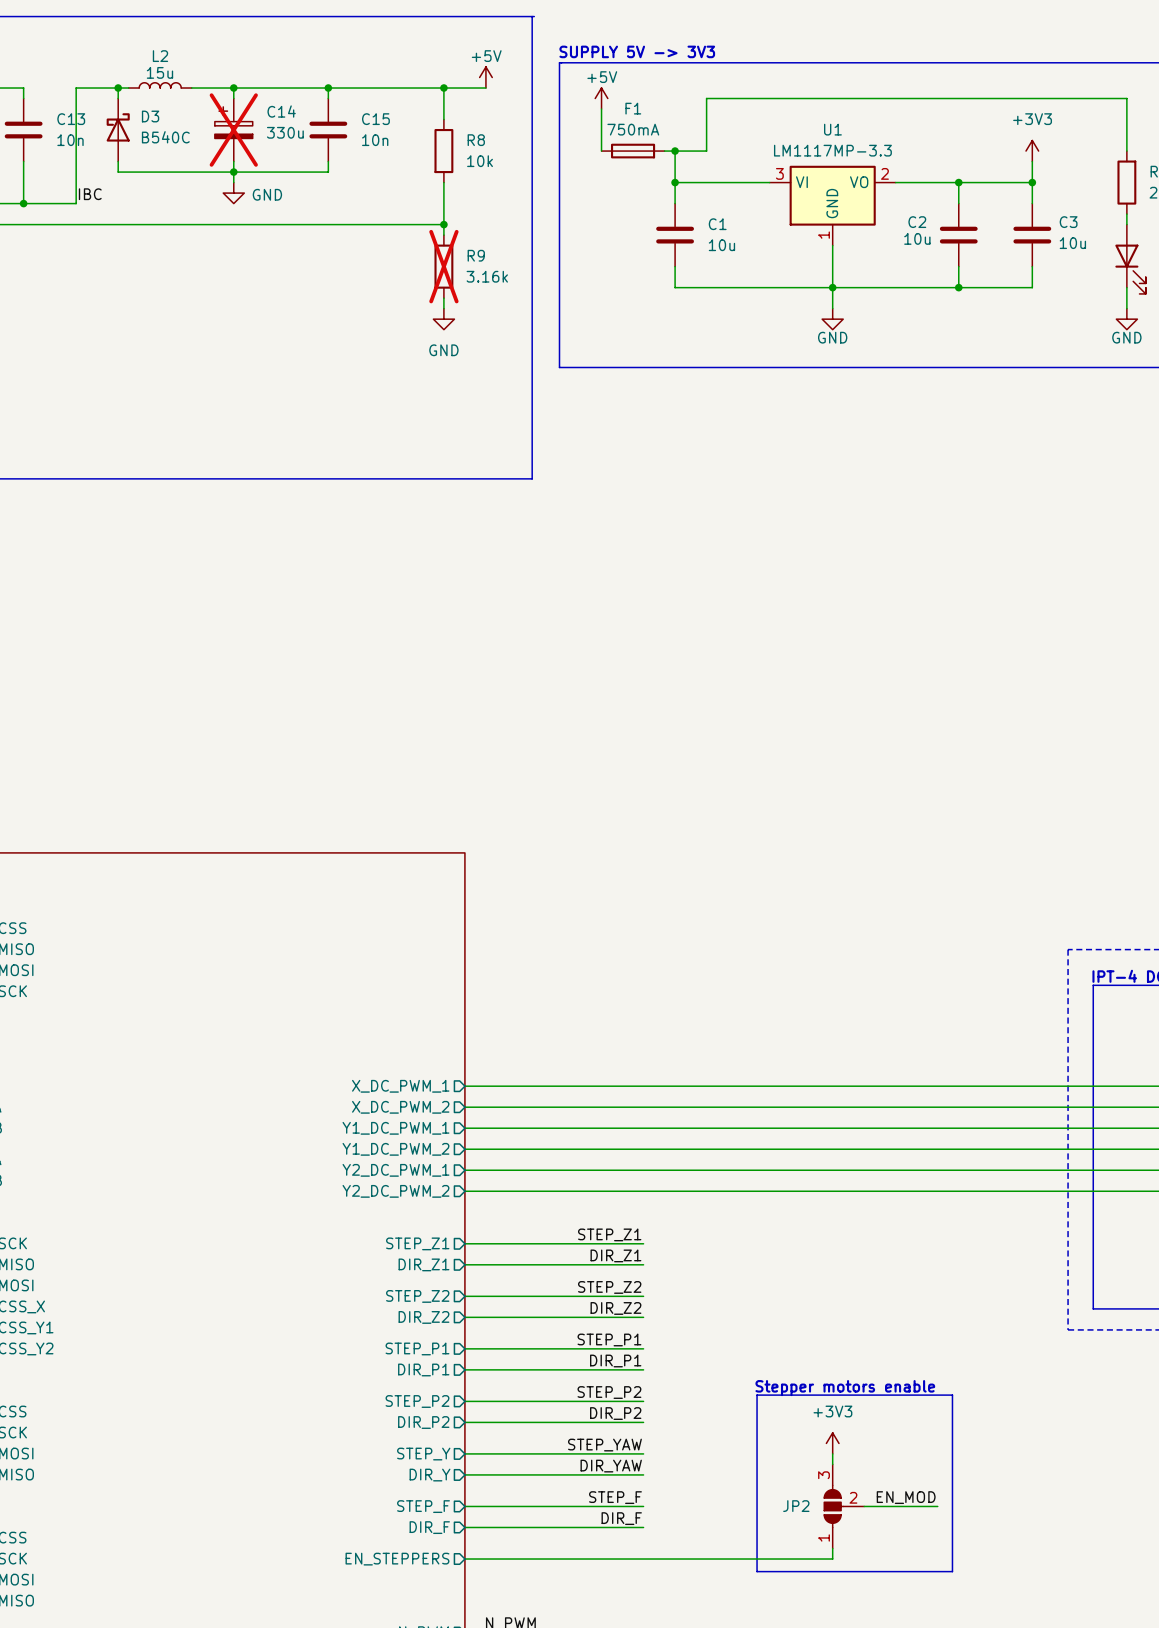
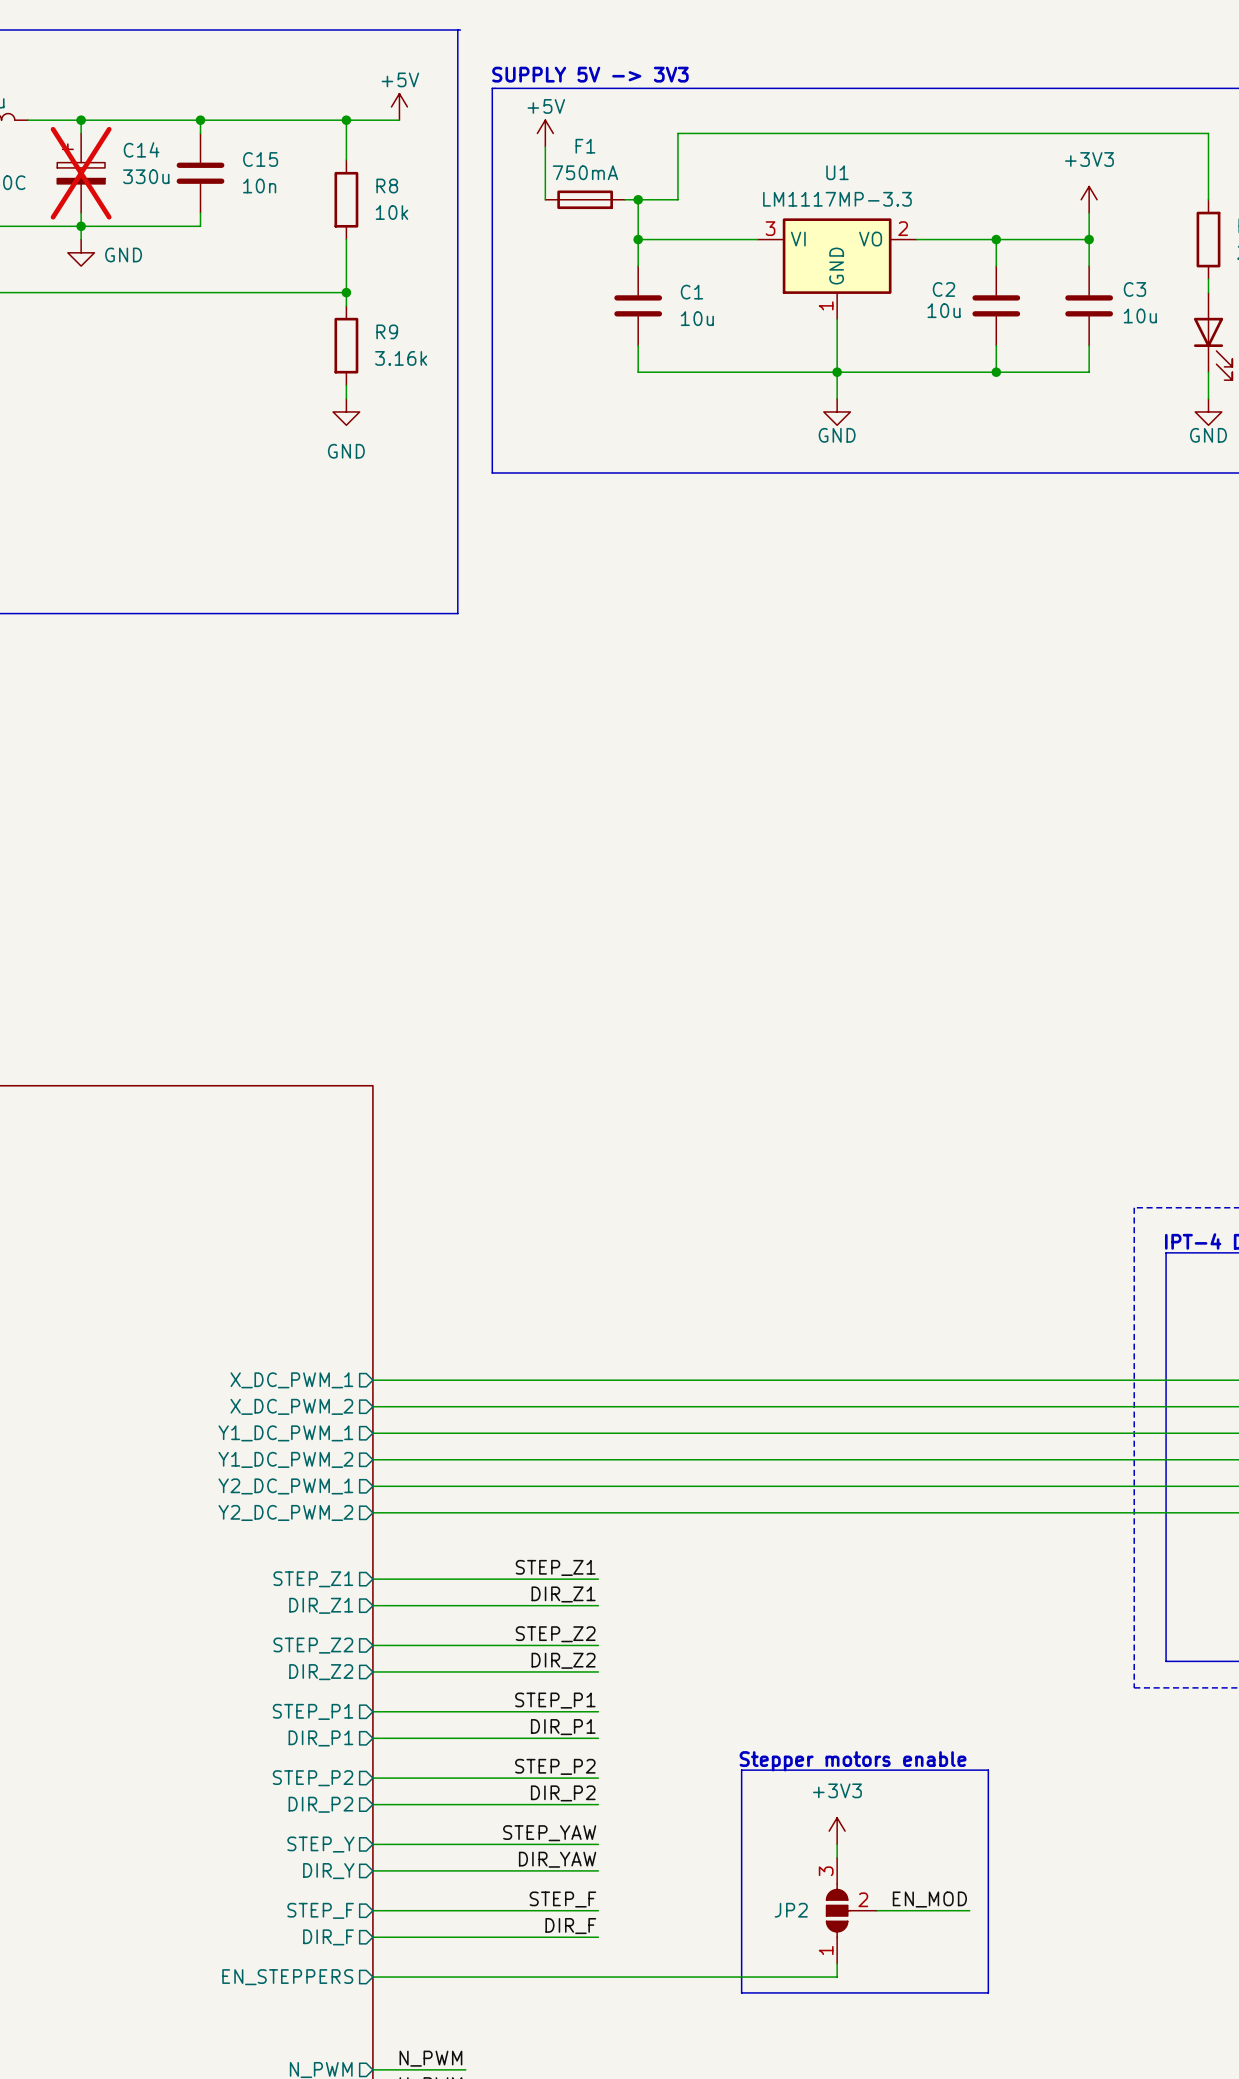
R9 do-not-place cross: (443, 266) -> none

